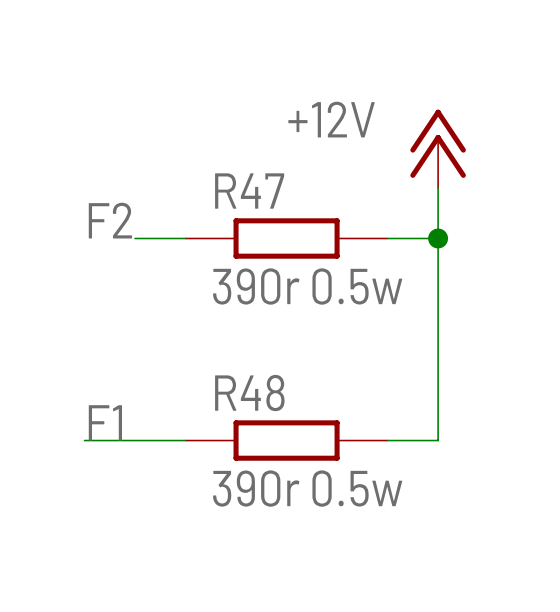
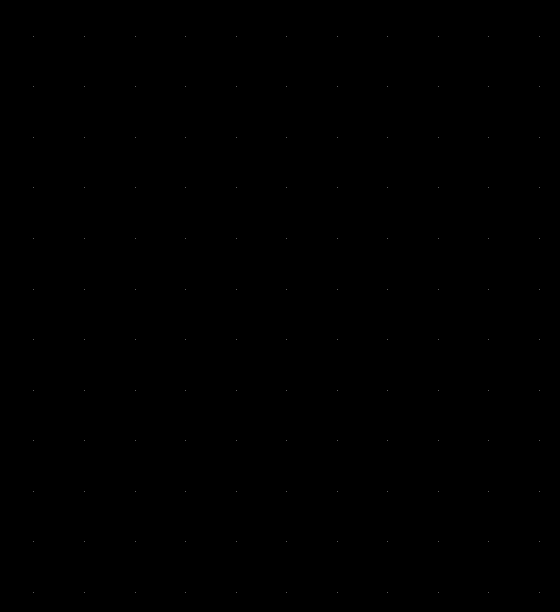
power symbol: +12V (438, 148) -> none
wire: (438, 187) (438, 440) (387, 440) -> none
label: F2 (110, 220) -> none
wire: (135, 238) (185, 238) -> none
R47: 390r 0.5w (286, 238) -> none
wire: (387, 238) (438, 238) -> none
junction: (438, 238) -> none
label: F1 (105, 422) -> none
wire: (84, 440) (185, 440) -> none
R48: 390r 0.5w (286, 440) -> none

